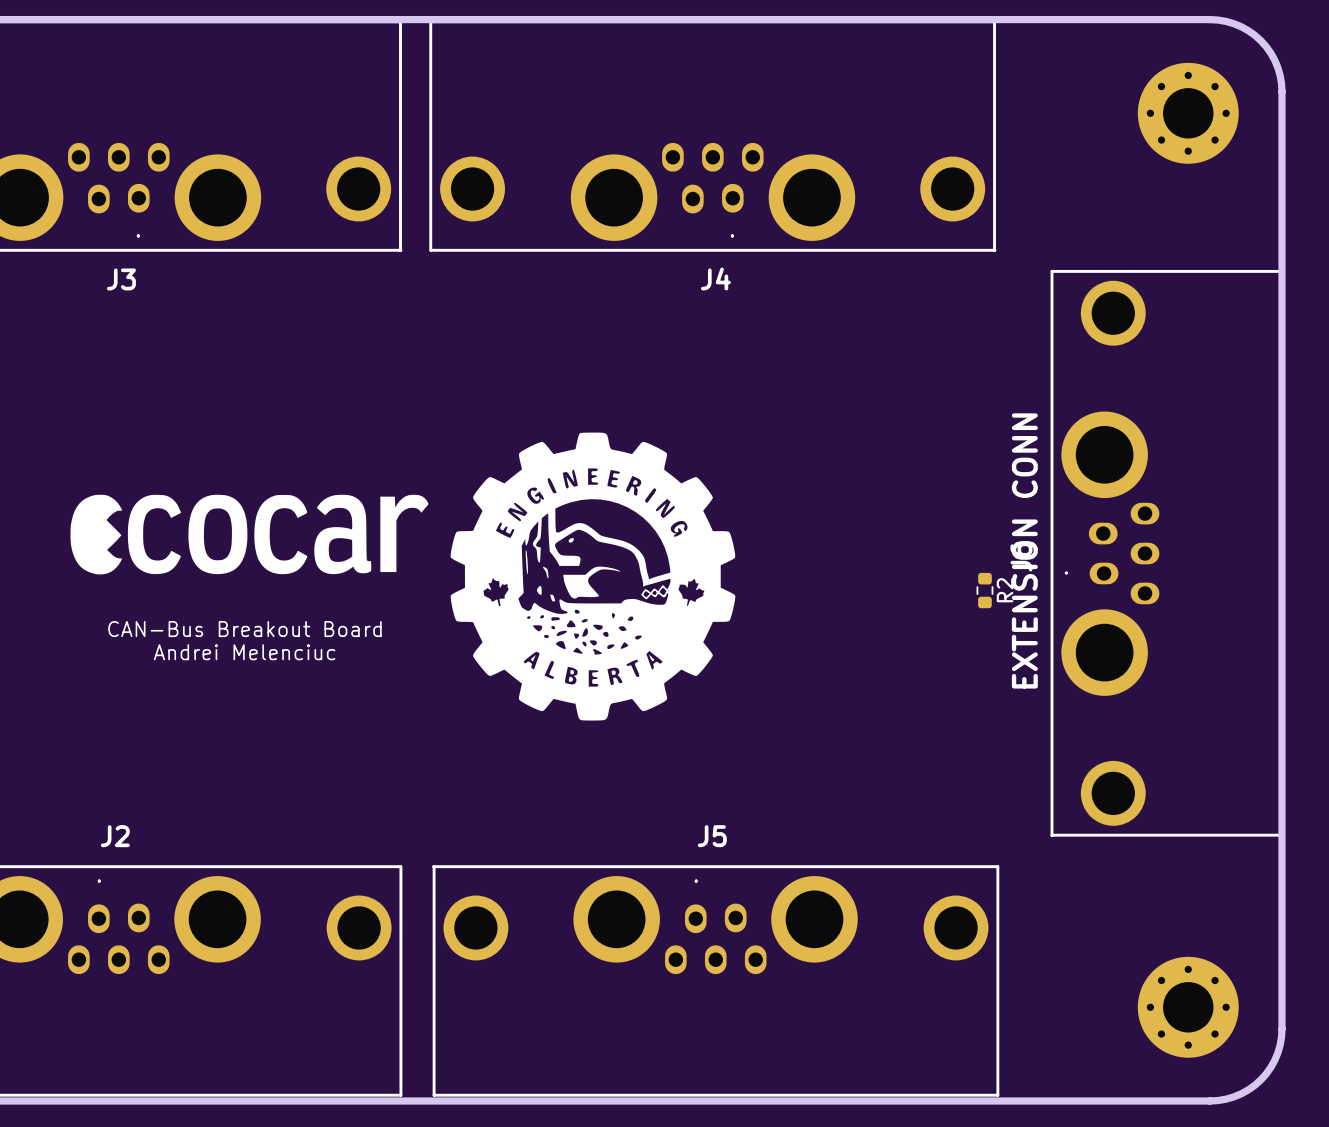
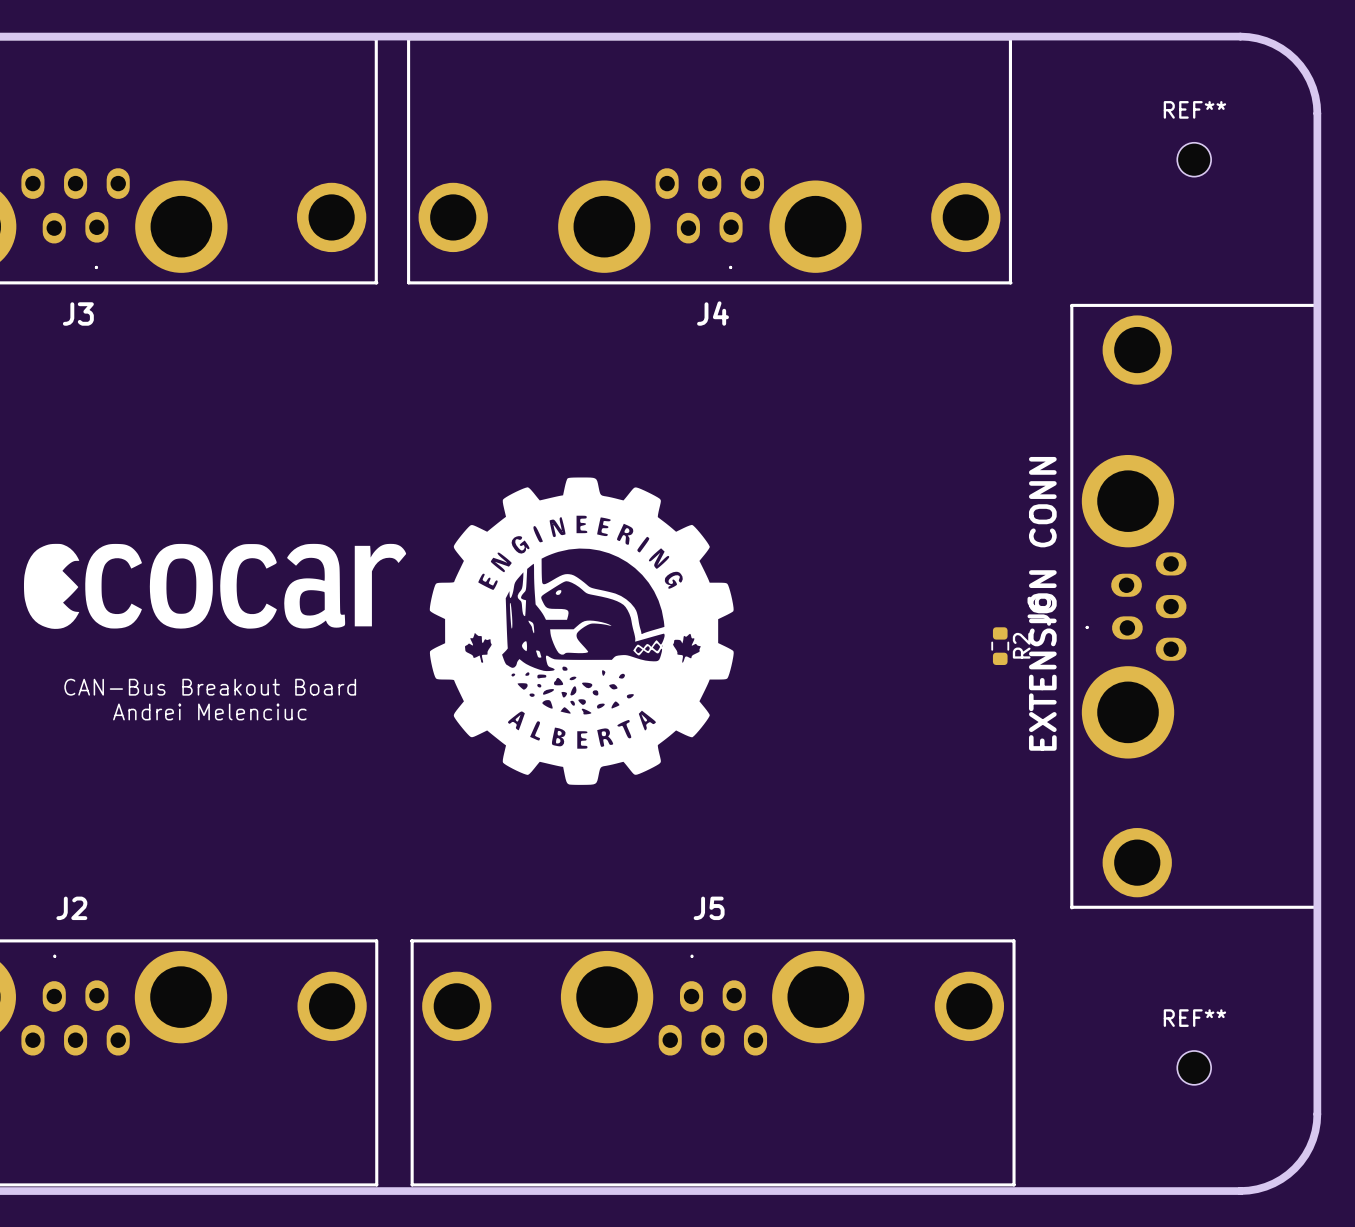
part: (1188, 113) -> none
REF**: none -> (1194, 159)
REF**: none -> (1194, 1067)
part: (1188, 1007) -> none

